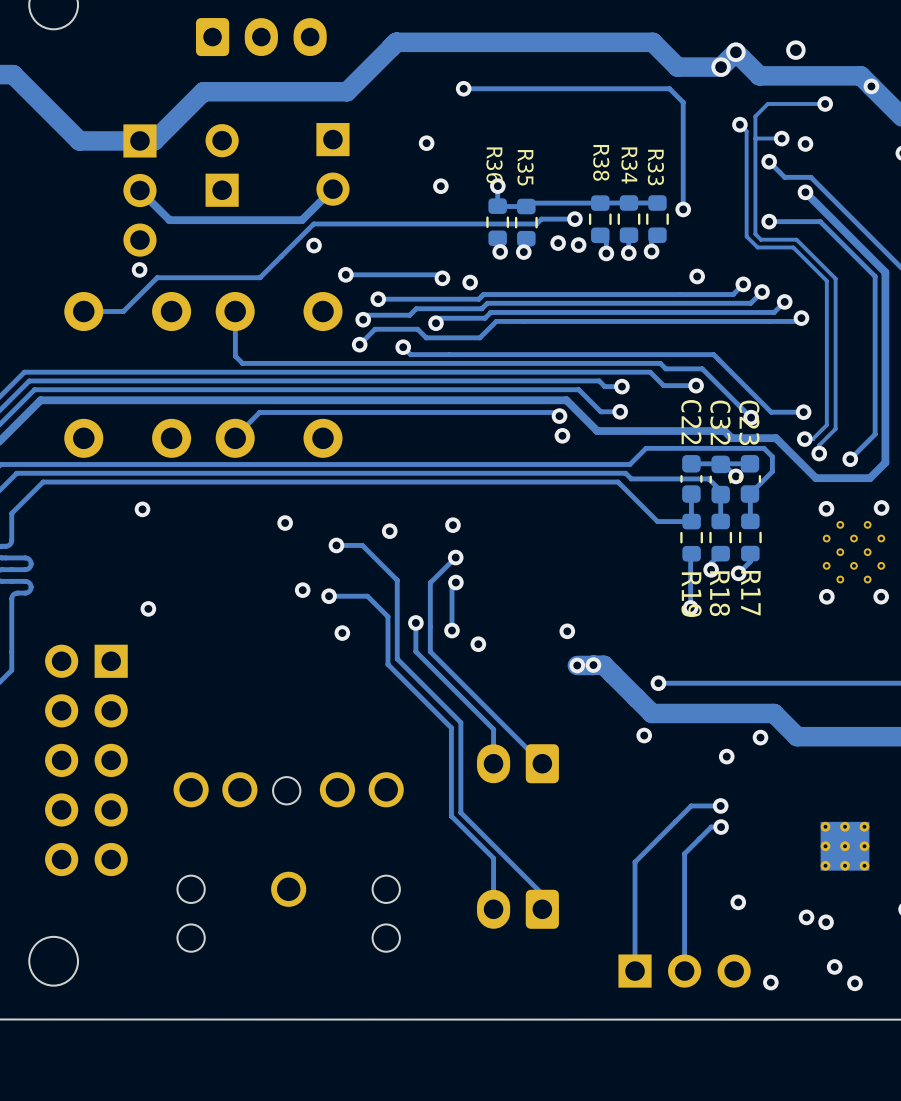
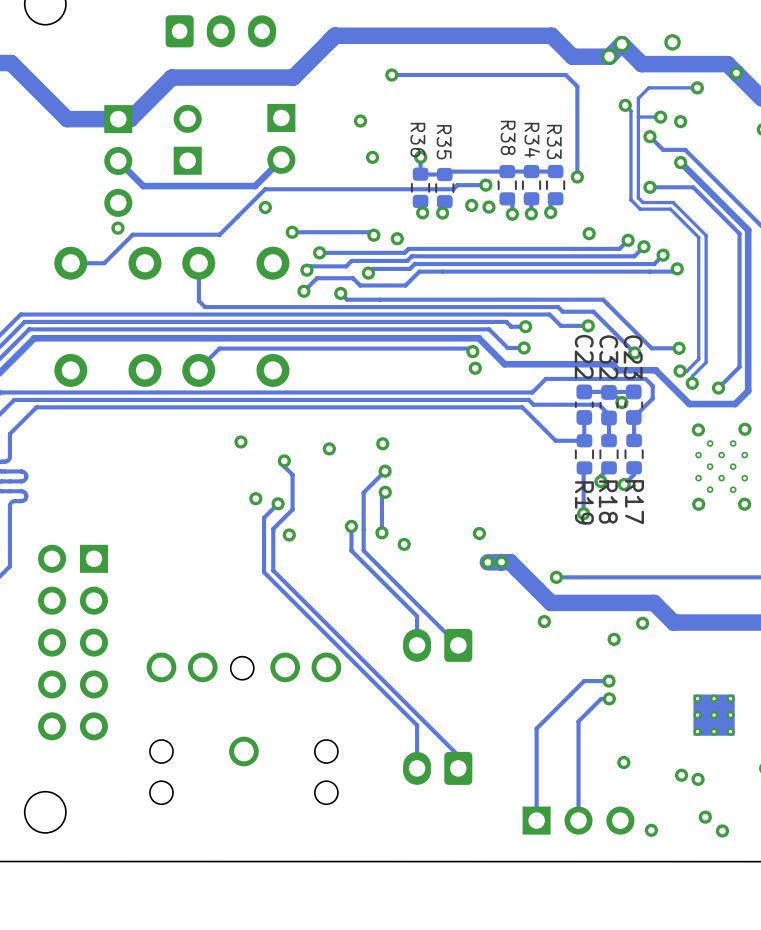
via: (142, 509) -> none
track: (336, 545) (362, 545) (397, 580) (397, 658) (460, 722) (460, 812) -> (284, 460) (284, 466) (292, 474) (292, 509) (273, 528) (273, 570) (389, 686)
track: (329, 596) (367, 596) (387, 616) (387, 664) (451, 727) (451, 816) -> (278, 503) (264, 517) (264, 572) (381, 689)
via: (148, 608) -> none

